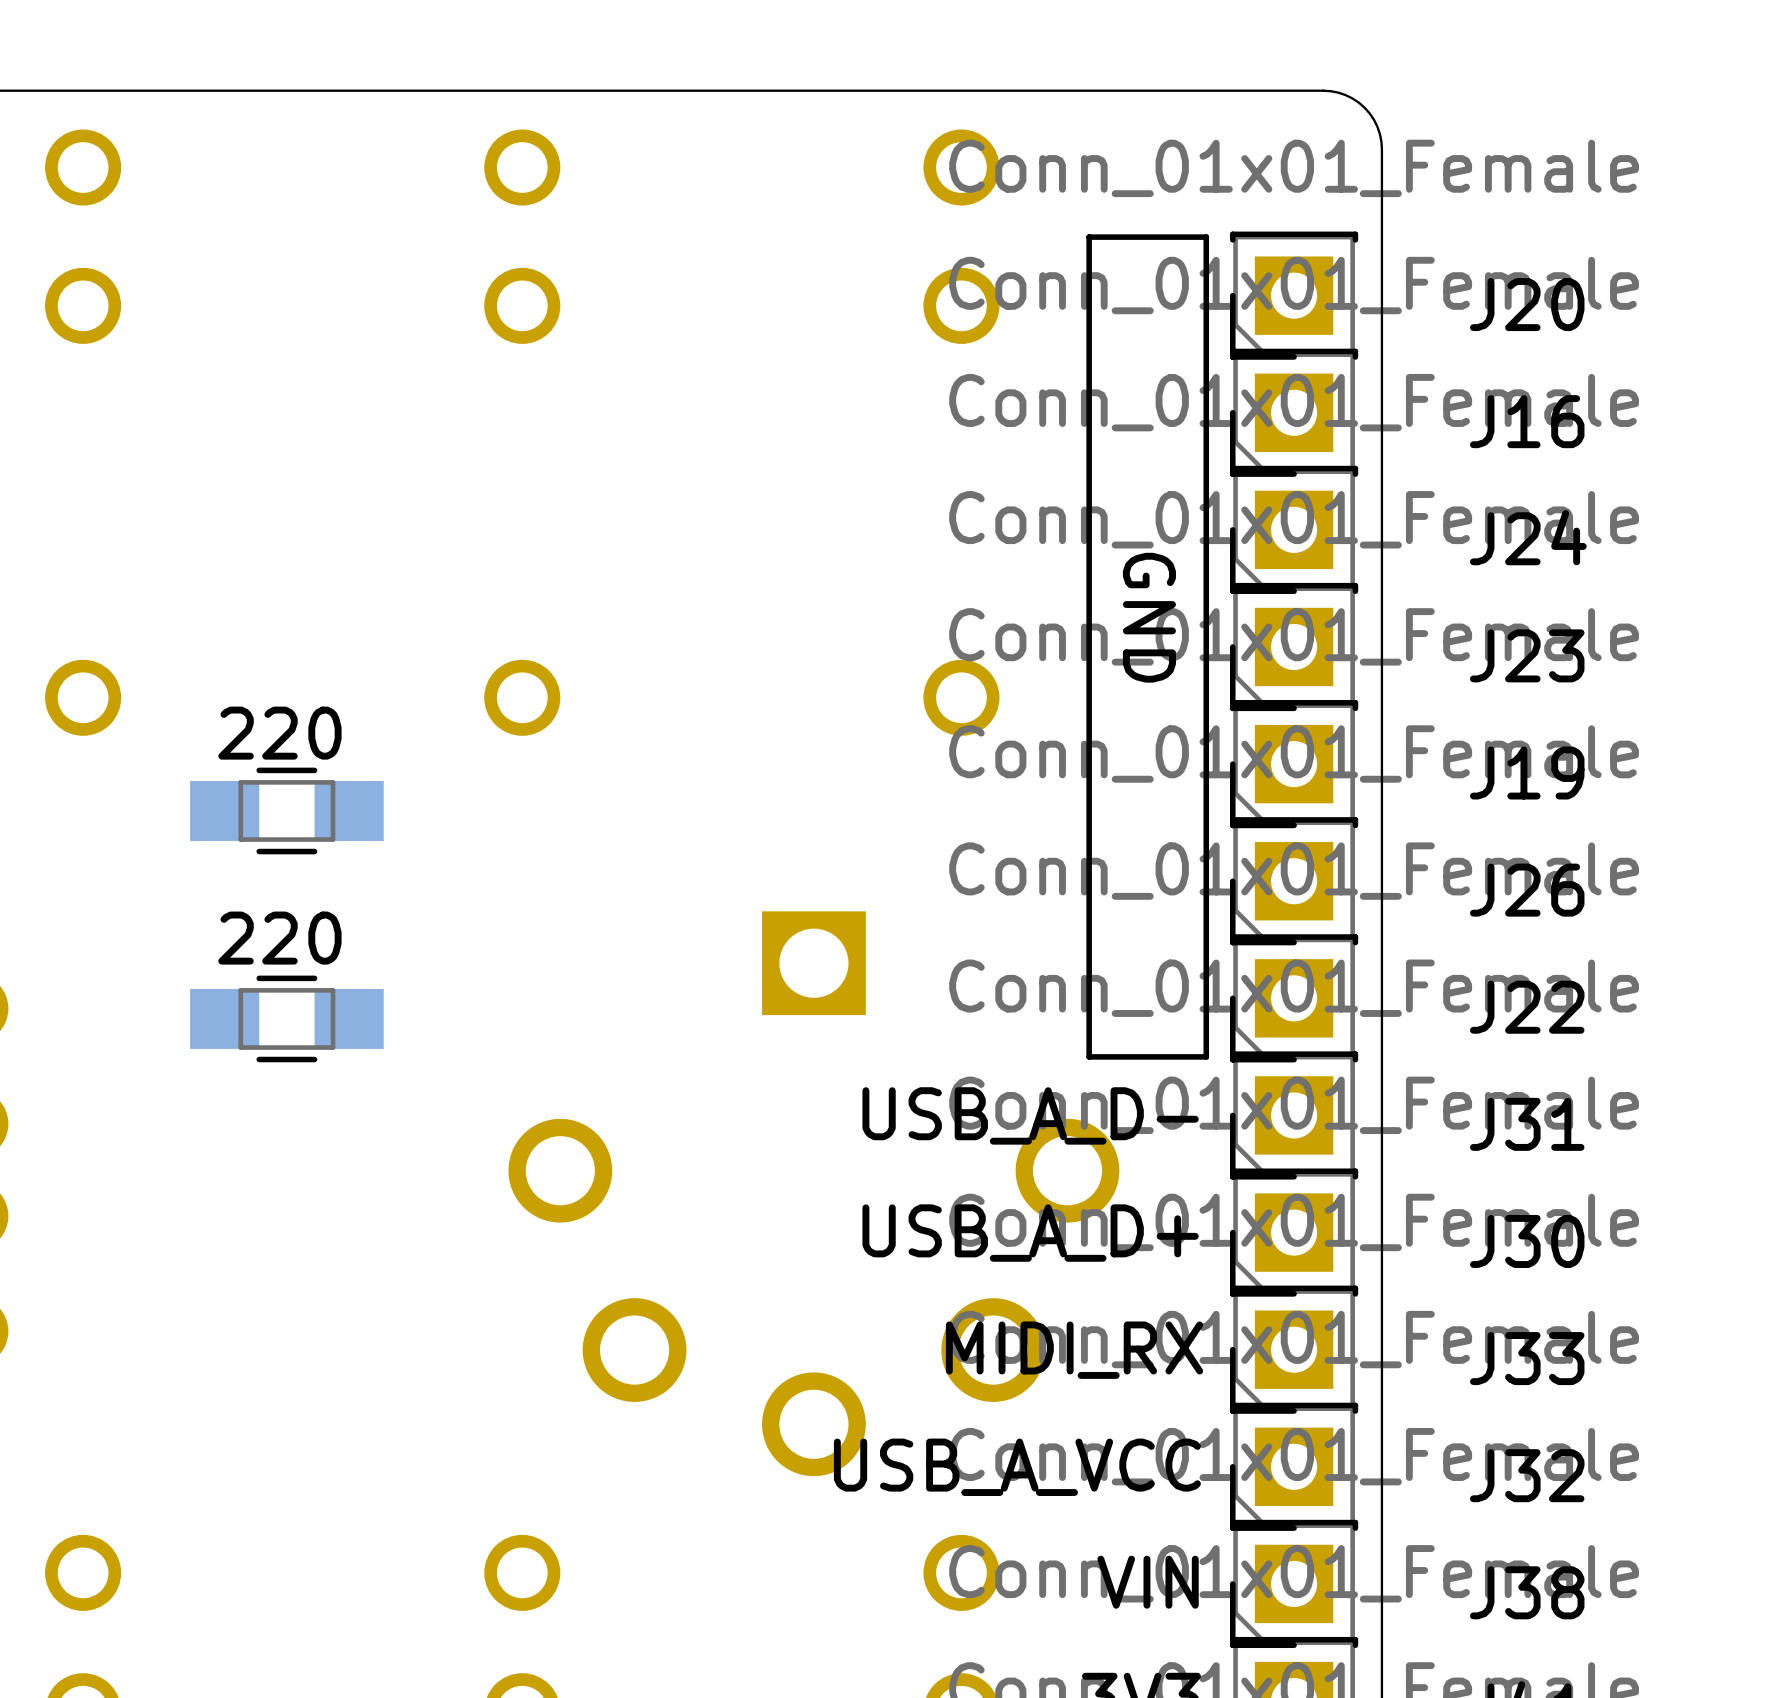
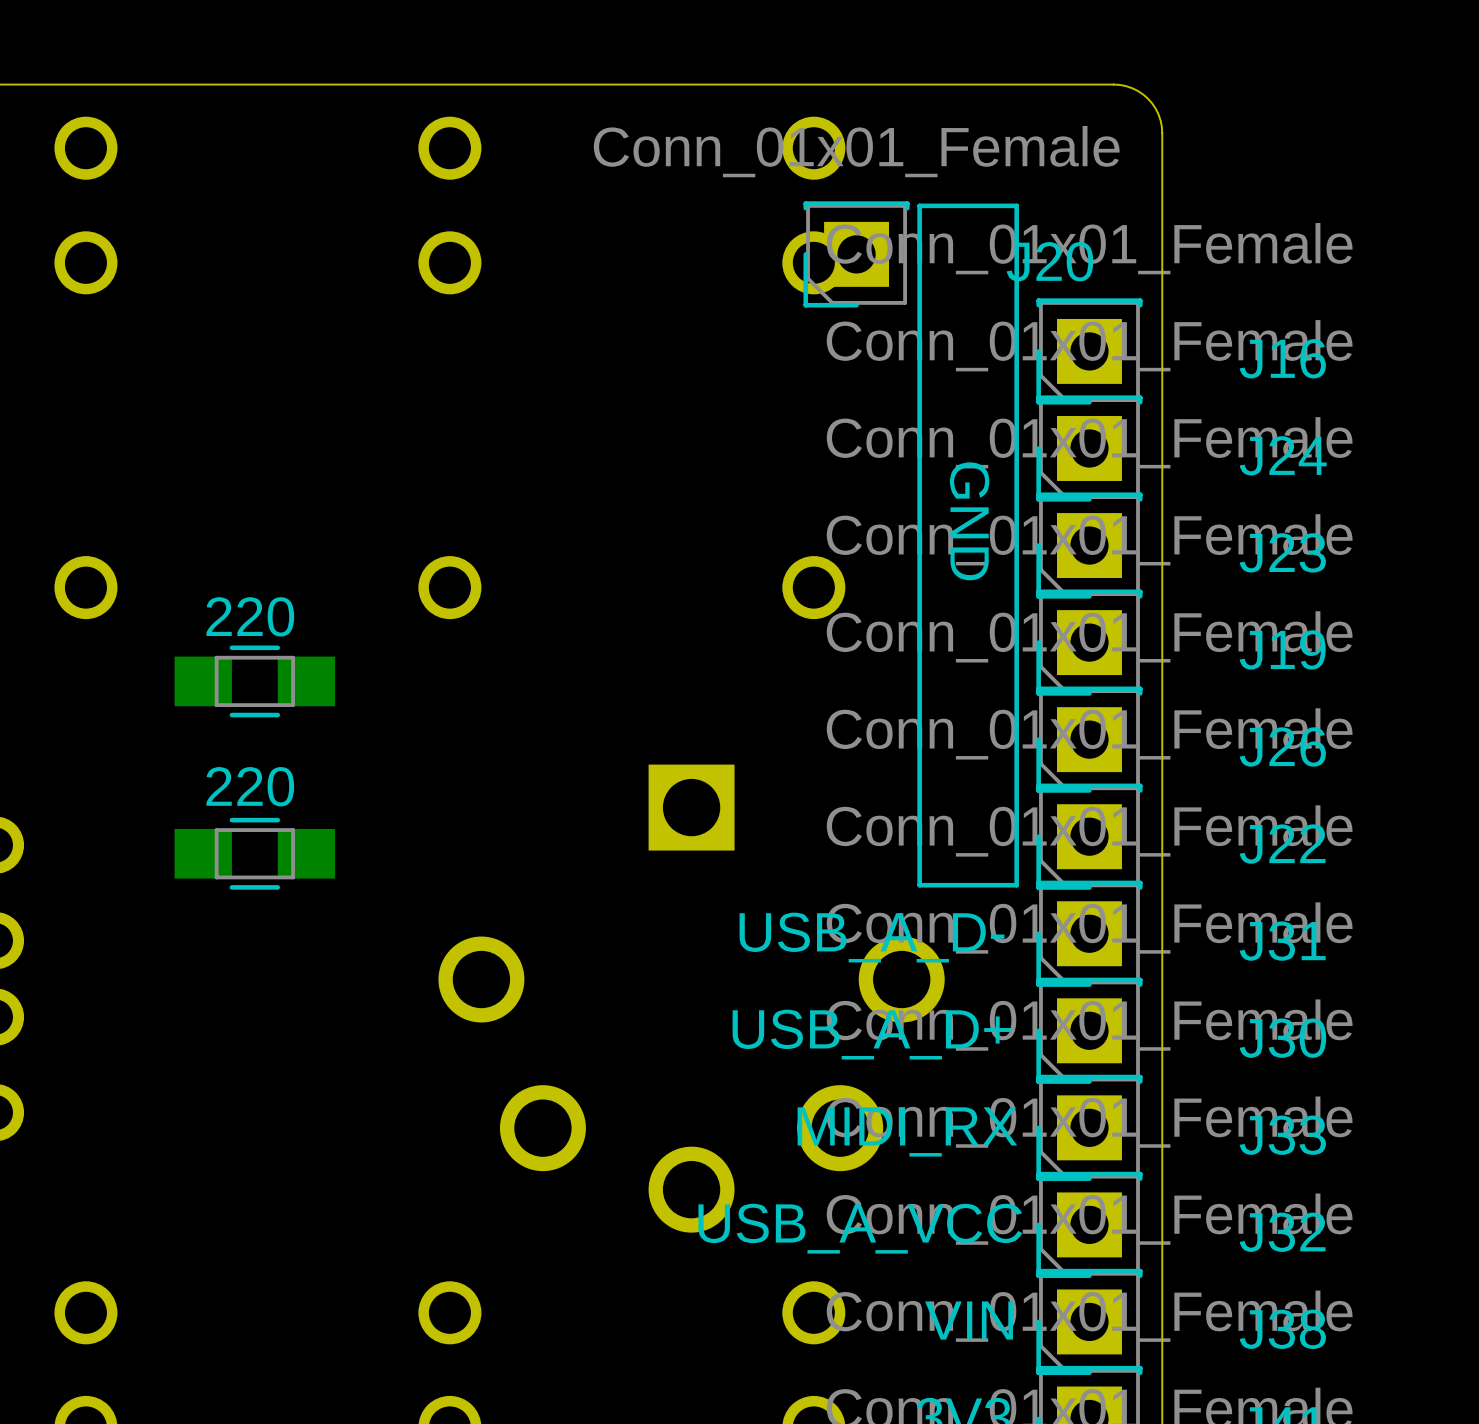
J20 position: (1294, 295) -> (856, 254)

